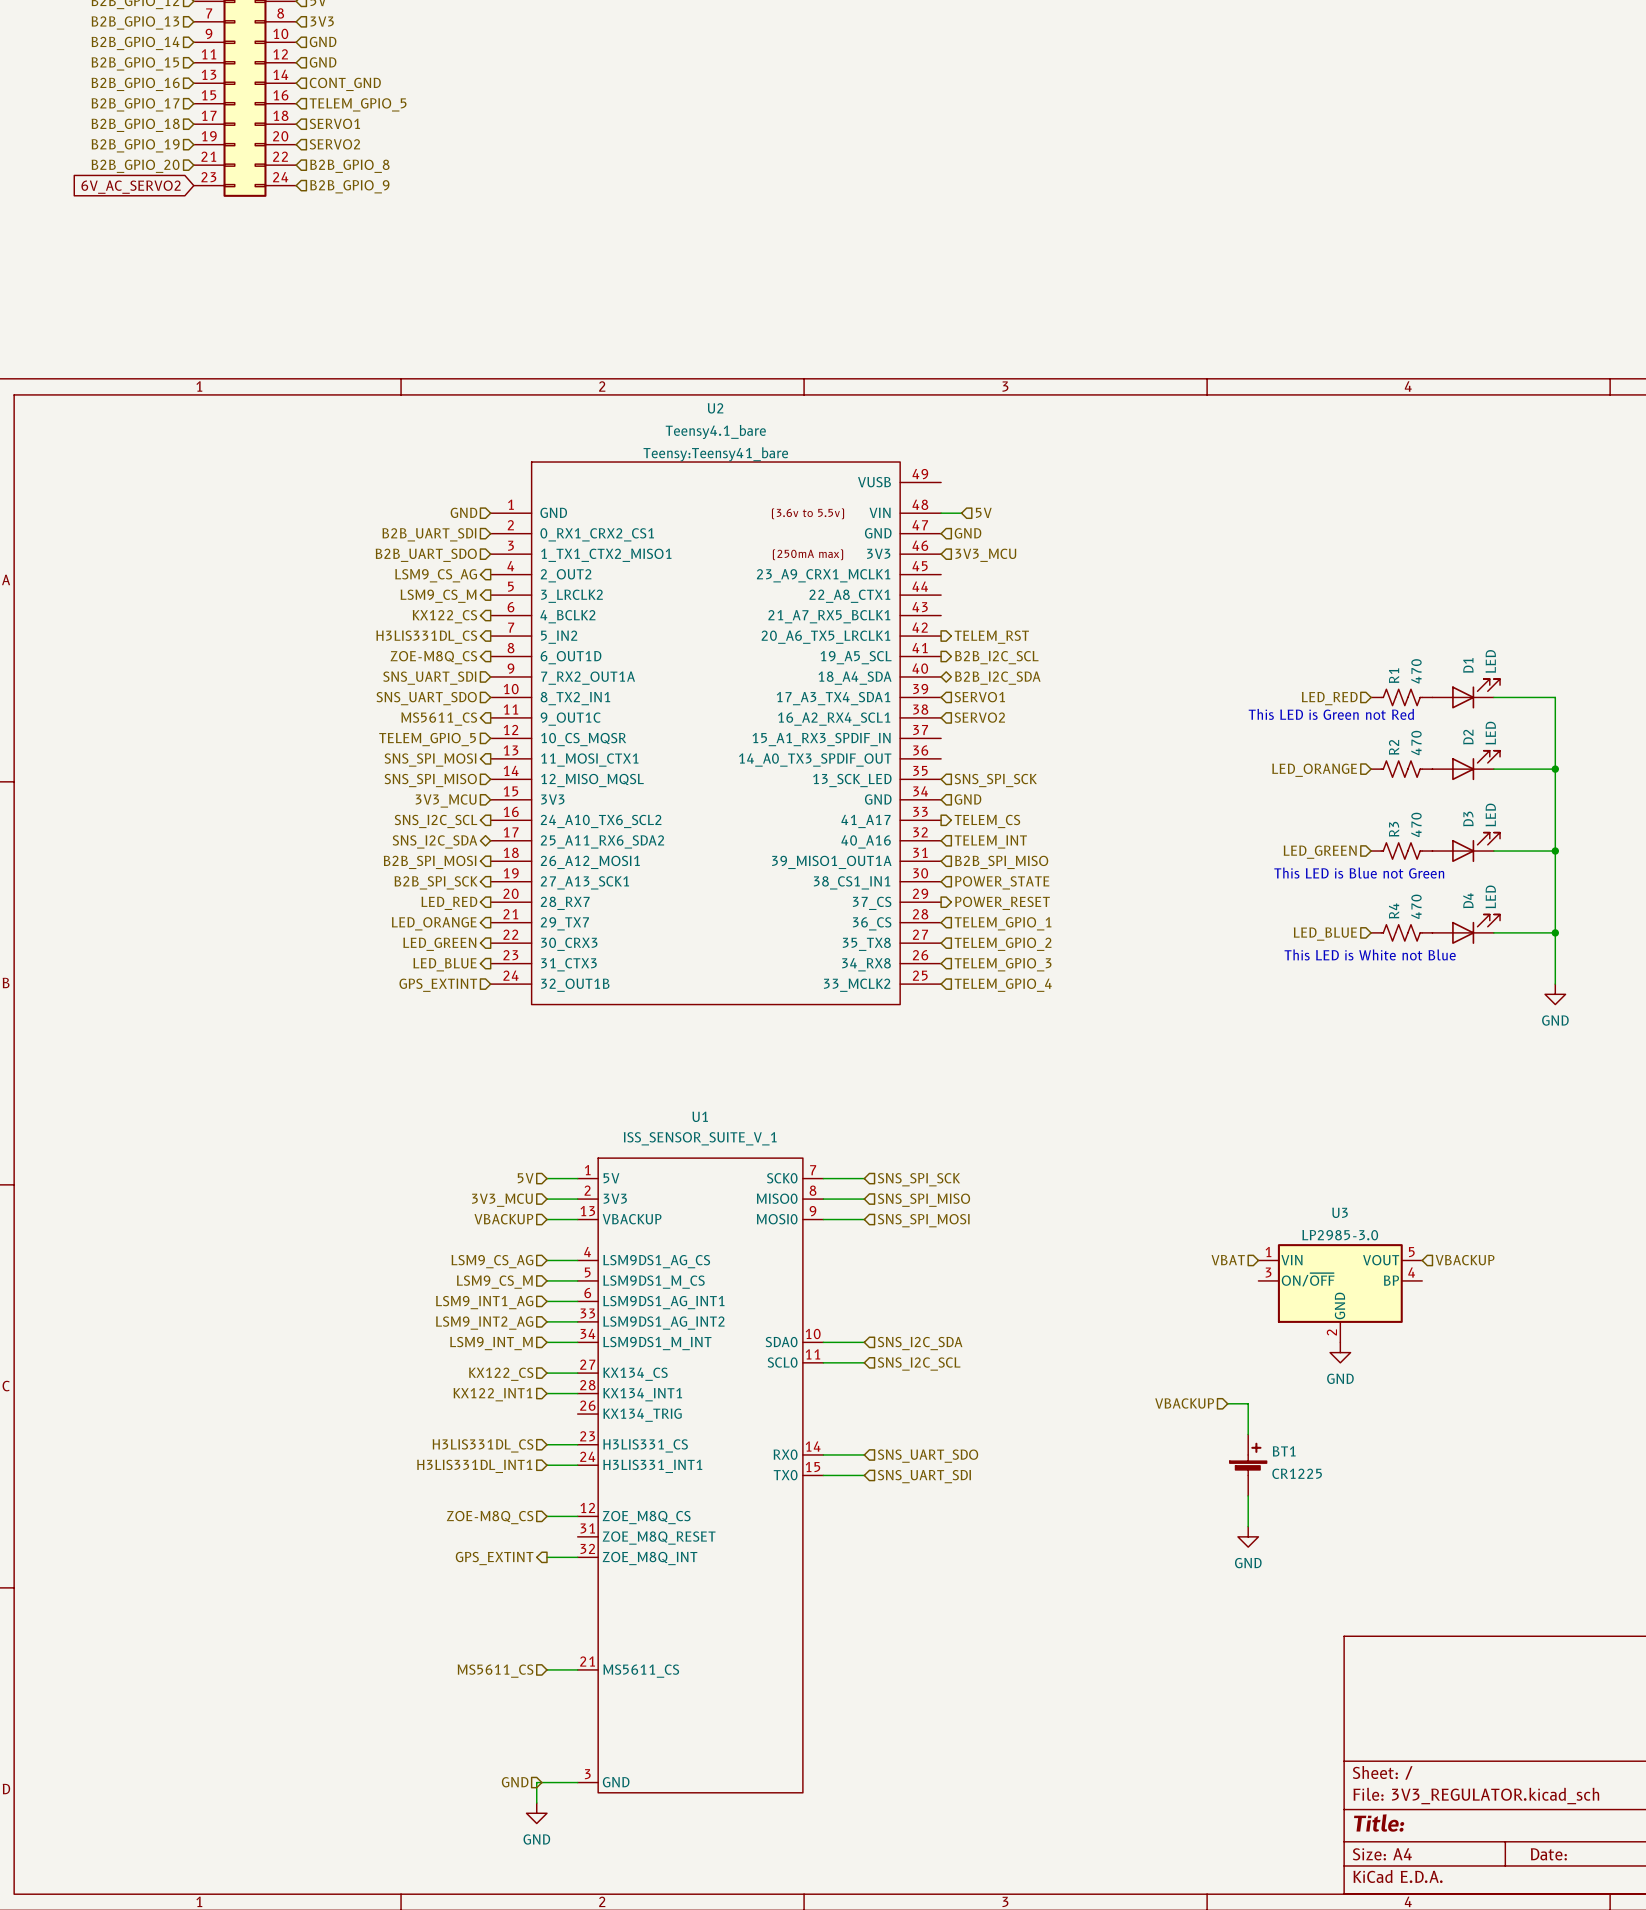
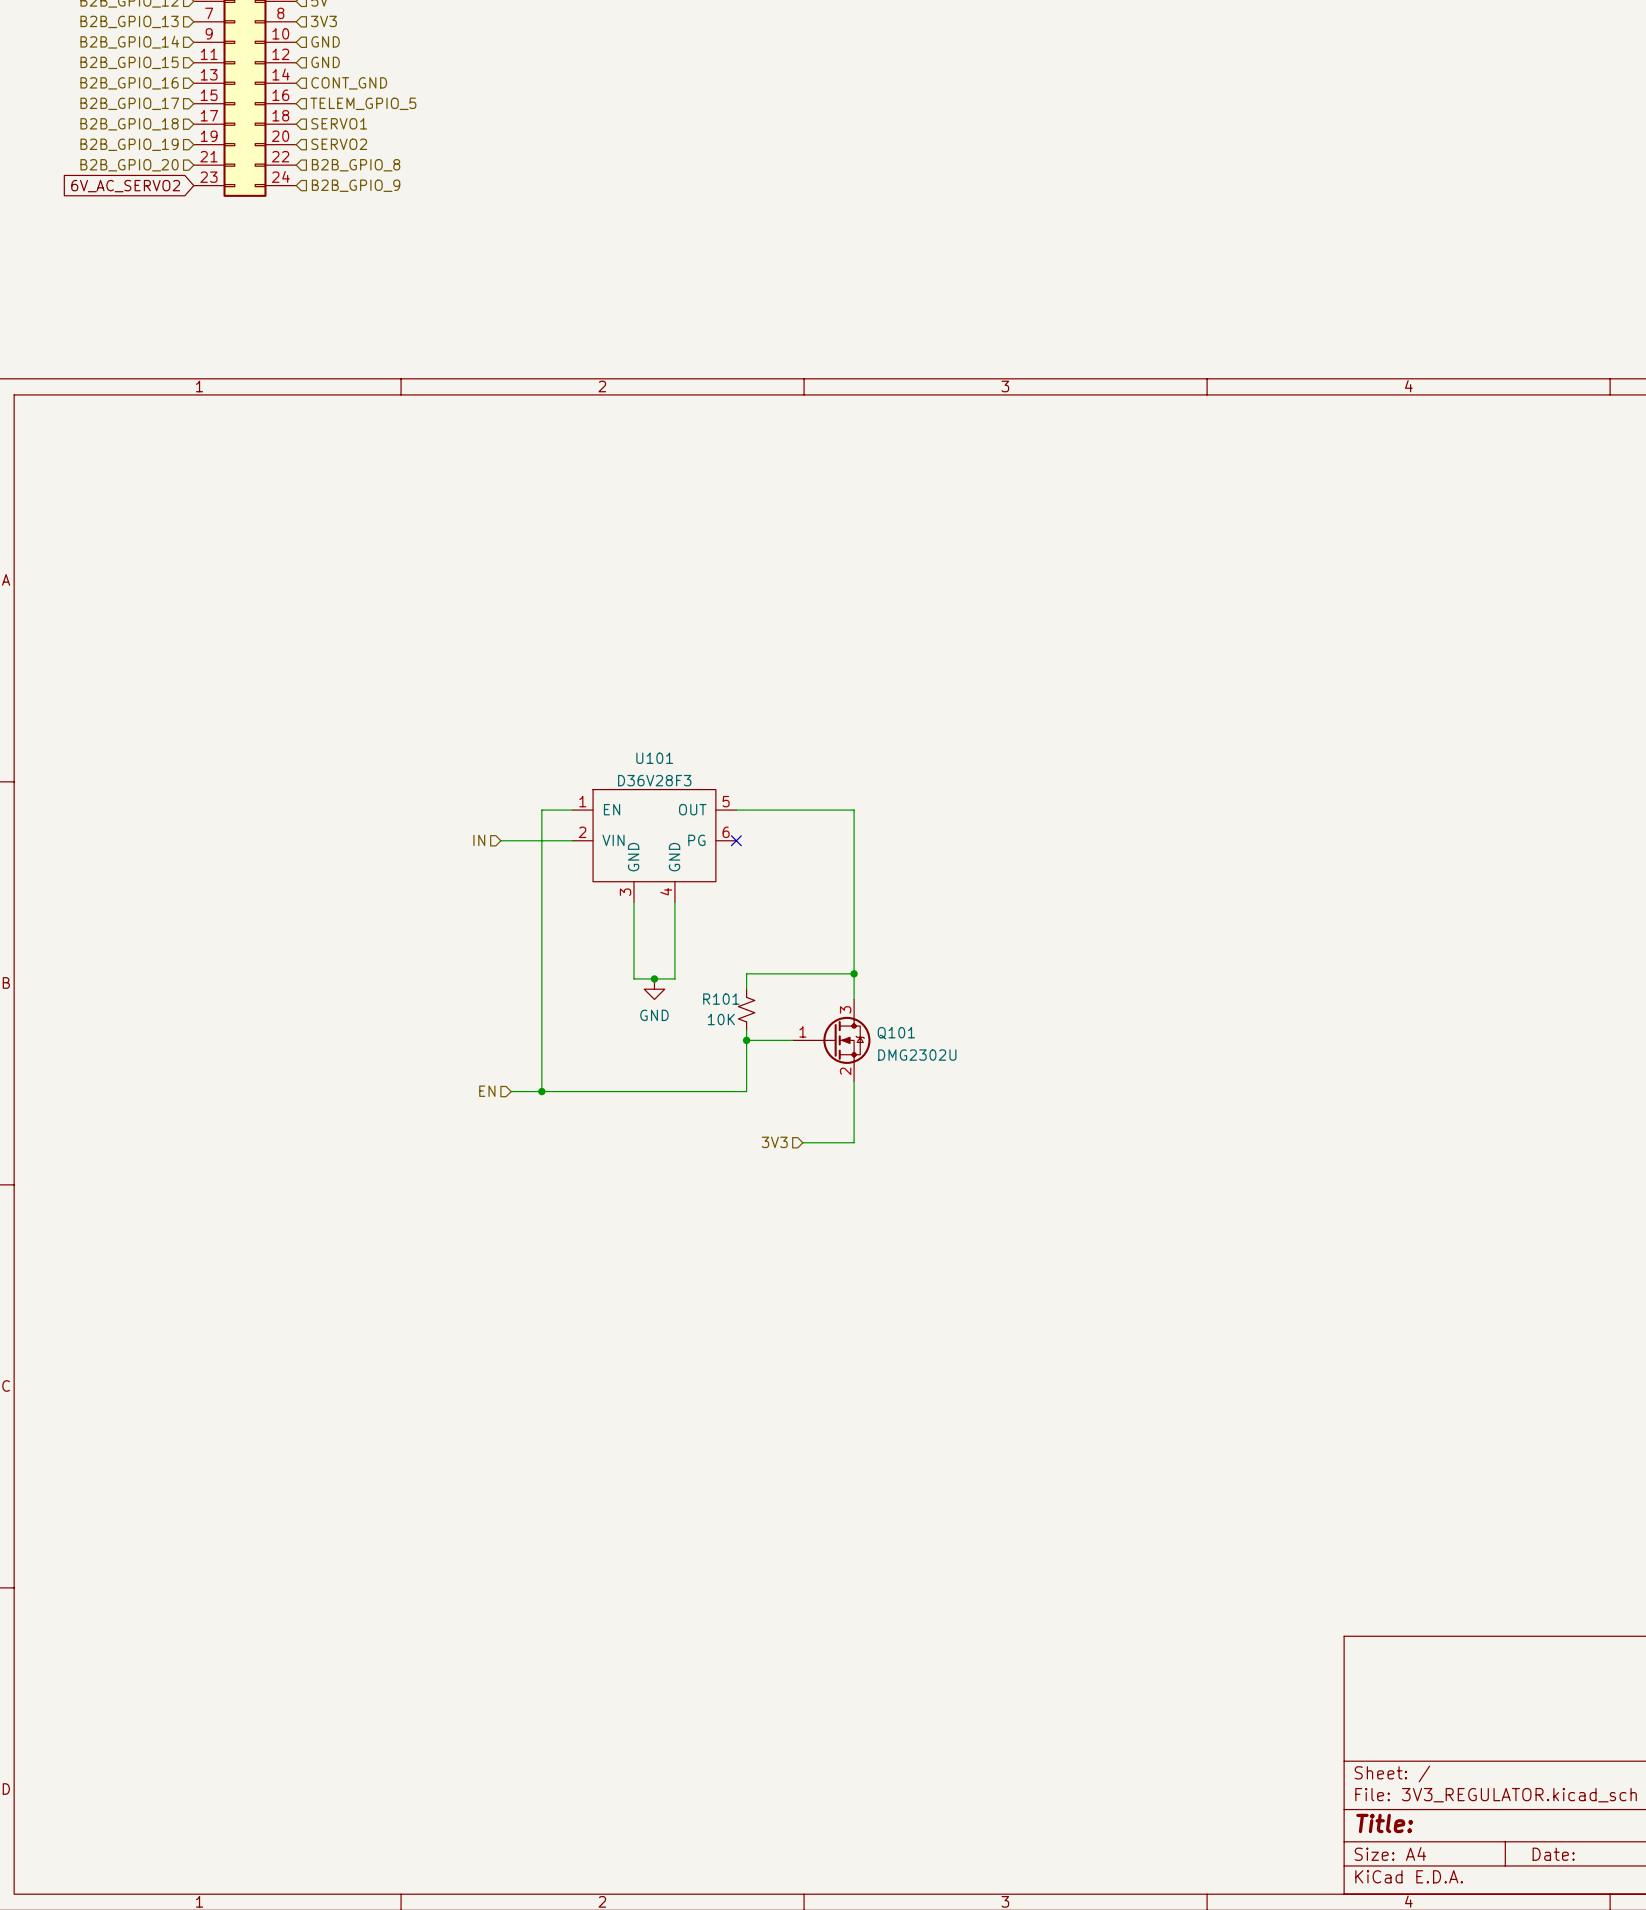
hierarchical label: GND (463, 512) -> none
hierarchical label: 5V (983, 512) -> none
wire: (941, 513) (961, 513) -> none
hierarchical label: GND (968, 533) -> none
hierarchical label: B2B_UART_SDI (429, 534) -> none
hierarchical label: B2B_UART_SDO (426, 555) -> none
hierarchical label: 3V3_MCU (985, 555) -> none
hierarchical label: LSM9_CS_AG (436, 575) -> none
hierarchical label: LSM9_CS_M (438, 596) -> none
hierarchical label: KX122_CS (444, 616) -> none
hierarchical label: H3LIS331DL_CS (426, 637) -> none
hierarchical label: TELEM_RST (991, 637) -> none
hierarchical label: ZOE-M8Q_CS (433, 657) -> none
hierarchical label: B2B_I2C_SCL (996, 657) -> none
hierarchical label: SNS_UART_SDI (429, 678) -> none
hierarchical label: B2B_I2C_SDA (997, 678) -> none
D1: LED (1466, 693) -> none
hierarchical label: SERVO1 (979, 697) -> none
R1: 470 (1401, 697) -> none
wire: (1493, 697) (1555, 697) (1555, 984) -> none
hierarchical label: SNS_UART_SDO (426, 698) -> none
hierarchical label: LED_RED (1329, 698) -> none
text: This LED is Green not Red (1331, 714) -> none
hierarchical label: SERVO2 (979, 717) -> none
hierarchical label: MS5611_CS (439, 719) -> none
U2: Teensy4.1_bare (715, 733) -> none
hierarchical label: TELEM_GPIO_5 (427, 739) -> none
hierarchical label: SNS_SPI_MOSI (430, 760) -> none
D2: LED (1466, 765) -> none
R2: 470 (1401, 769) -> none
wire: (1493, 769) (1555, 769) -> none
junction: (1555, 769) -> none
hierarchical label: LED_ORANGE (1314, 770) -> none
hierarchical label: SNS_SPI_MISO (430, 780) -> none
hierarchical label: SNS_SPI_SCK (995, 780) -> none
hierarchical label: GND (968, 799) -> none
hierarchical label: 3V3_MCU (446, 800) -> none
wire: none -> (572, 810) (541, 810) (541, 1091)
wire: none -> (736, 810) (854, 810) (854, 999)
hierarchical label: SNS_I2C_SCL (435, 821) -> none
hierarchical label: TELEM_CS (987, 821) -> none
hierarchical label: none -> IN (479, 840)
wire: none -> (500, 840) (572, 840)
no-connect mark: none -> (736, 840)
hierarchical label: SNS_I2C_SDA (434, 841) -> none
hierarchical label: TELEM_INT (990, 841) -> none
U101: none -> D36V28F3 (654, 845)
D3: LED (1466, 847) -> none
R3: 470 (1401, 851) -> none
wire: (1493, 851) (1555, 851) -> none
junction: (1555, 851) -> none
hierarchical label: LED_GREEN (1320, 852) -> none
hierarchical label: B2B_SPI_MOSI (430, 862) -> none
hierarchical label: B2B_SPI_MISO (1001, 862) -> none
text: This LED is Blue not Green (1359, 873) -> none
hierarchical label: B2B_SPI_SCK (436, 882) -> none
hierarchical label: POWER_STATE (1002, 882) -> none
wire: none -> (633, 902) (633, 978) (674, 978) (674, 902)
hierarchical label: LED_RED (449, 903) -> none
hierarchical label: POWER_RESET (1002, 903) -> none
hierarchical label: LED_ORANGE (434, 923) -> none
hierarchical label: TELEM_GPIO_1 (1003, 923) -> none
D4: LED (1466, 929) -> none
R4: 470 (1401, 932) -> none
wire: (1493, 932) (1555, 932) -> none
junction: (1555, 932) -> none
hierarchical label: LED_BLUE (1325, 934) -> none
hierarchical label: LED_GREEN (439, 944) -> none
hierarchical label: TELEM_GPIO_2 (1003, 944) -> none
text: This LED is White not Blue (1370, 954) -> none
hierarchical label: LED_BLUE (445, 964) -> none
hierarchical label: TELEM_GPIO_3 (1003, 964) -> none
wire: none -> (854, 973) (746, 973) (746, 989)
junction: none -> (854, 973)
junction: none -> (654, 978)
hierarchical label: GPS_EXTINT (438, 985) -> none
hierarchical label: TELEM_GPIO_4 (1003, 985) -> none
power symbol: none -> GND (654, 989)
power symbol: GND (1555, 994) -> none
R101: none -> 10K (746, 1009)
wire: none -> (746, 1030) (746, 1091) (511, 1091)
wire: none -> (746, 1040) (792, 1040)
junction: none -> (746, 1040)
Q101: none -> DMG2302U (831, 1040)
wire: none -> (854, 1081) (854, 1142) (802, 1142)
hierarchical label: none -> EN (487, 1091)
junction: none -> (541, 1091)
hierarchical label: none -> 3V3 (774, 1142)
hierarchical label: 5V (525, 1178) -> none
wire: (546, 1178) (577, 1178) -> none
wire: (823, 1178) (864, 1178) -> none
hierarchical label: SNS_SPI_SCK (918, 1179) -> none
wire: (546, 1199) (577, 1199) -> none
wire: (823, 1199) (864, 1199) -> none
hierarchical label: 3V3_MCU (502, 1200) -> none
hierarchical label: SNS_SPI_MISO (923, 1200) -> none
hierarchical label: VBACKUP (503, 1219) -> none
wire: (546, 1219) (577, 1219) -> none
wire: (823, 1219) (864, 1219) -> none
hierarchical label: SNS_SPI_MOSI (923, 1220) -> none
wire: (546, 1260) (577, 1260) -> none
hierarchical label: VBAT (1228, 1260) -> none
hierarchical label: VBACKUP (1465, 1260) -> none
hierarchical label: LSM9_CS_AG (492, 1261) -> none
wire: (546, 1280) (577, 1280) -> none
hierarchical label: LSM9_CS_M (494, 1282) -> none
U3: LP2985-3.0 (1340, 1293) -> none
wire: (546, 1301) (577, 1301) -> none
hierarchical label: LSM9_INT1_AG (484, 1302) -> none
wire: (546, 1321) (577, 1321) -> none
hierarchical label: LSM9_INT2_AG (484, 1323) -> none
wire: (546, 1342) (577, 1342) -> none
wire: (823, 1342) (864, 1342) -> none
hierarchical label: LSM9_INT_M (491, 1343) -> none
hierarchical label: SNS_I2C_SDA (920, 1343) -> none
power symbol: GND (1340, 1352) -> none
wire: (823, 1362) (864, 1362) -> none
hierarchical label: SNS_I2C_SCL (919, 1364) -> none
wire: (546, 1373) (577, 1373) -> none
hierarchical label: KX122_CS (501, 1374) -> none
wire: (546, 1393) (577, 1393) -> none
hierarchical label: KX122_INT1 (492, 1394) -> none
hierarchical label: VBACKUP (1184, 1403) -> none
wire: (1227, 1403) (1248, 1403) (1248, 1434) -> none
wire: (546, 1444) (577, 1444) -> none
hierarchical label: H3LIS331DL_CS (482, 1445) -> none
wire: (823, 1454) (864, 1454) -> none
hierarchical label: SNS_UART_SDO (928, 1456) -> none
wire: (546, 1465) (577, 1465) -> none
BT1: CR1225 (1248, 1465) -> none
hierarchical label: H3LIS331DL_INT1 (474, 1466) -> none
U1: ISS_SENSOR_SUITE_V_1 (700, 1475) -> none
wire: (823, 1475) (864, 1475) -> none
hierarchical label: SNS_UART_SDI (924, 1476) -> none
wire: (1248, 1495) (1248, 1526) -> none
wire: (546, 1516) (577, 1516) -> none
hierarchical label: ZOE-M8Q_CS (490, 1517) -> none
power symbol: GND (1248, 1536) -> none
wire: (546, 1557) (577, 1557) -> none
hierarchical label: GPS_EXTINT (494, 1558) -> none
wire: (546, 1669) (577, 1669) -> none
hierarchical label: MS5611_CS (495, 1671) -> none
hierarchical label: GND (515, 1782) -> none
wire: (577, 1782) (536, 1782) (536, 1803) -> none
power symbol: GND (536, 1813) -> none

